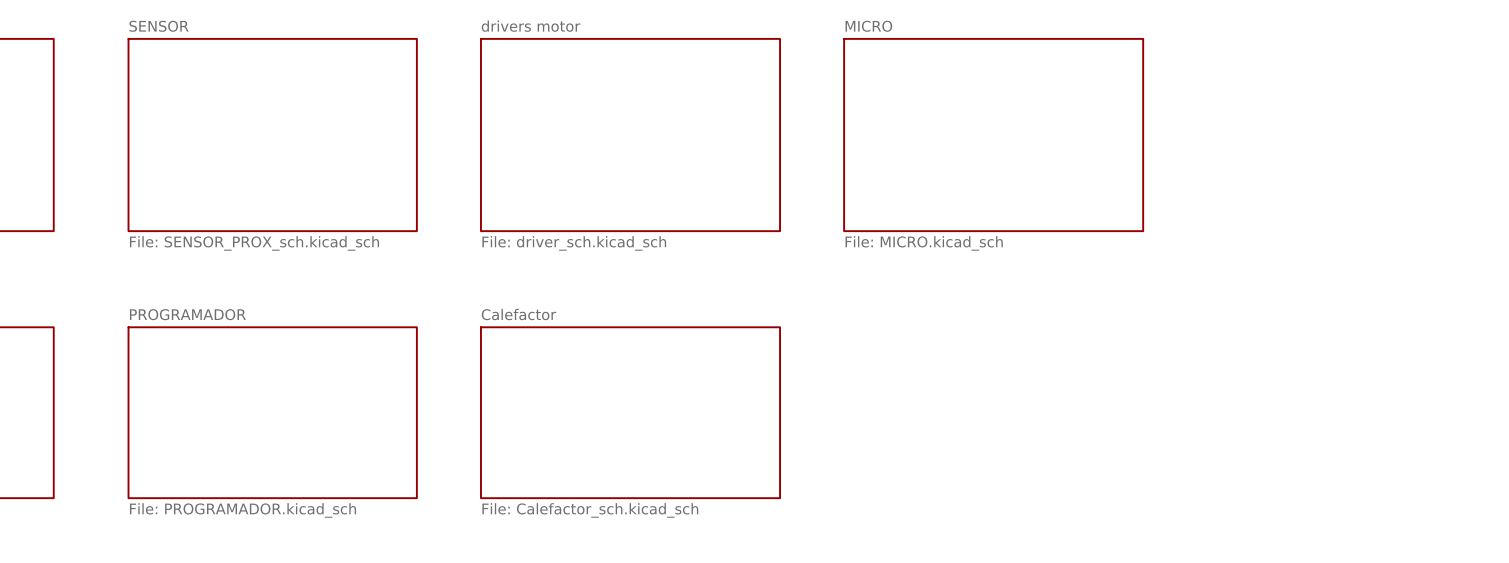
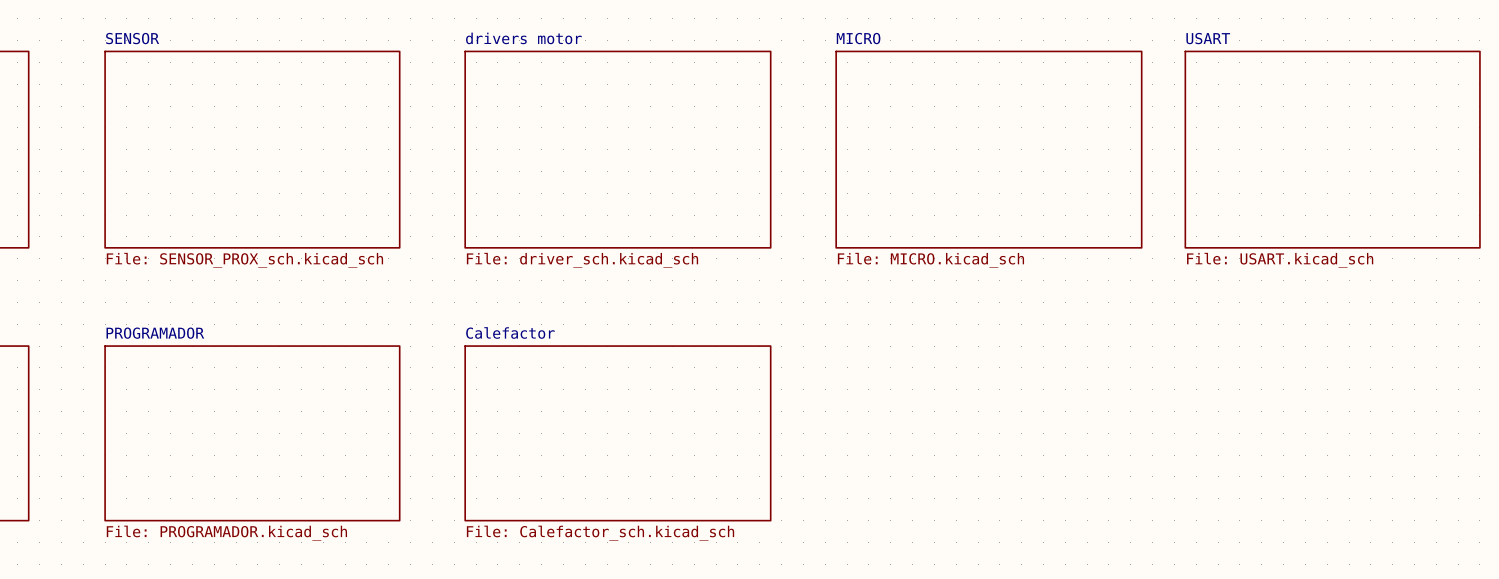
sheet USART: none -> File: USART.kicad_sch (1332, 149)

